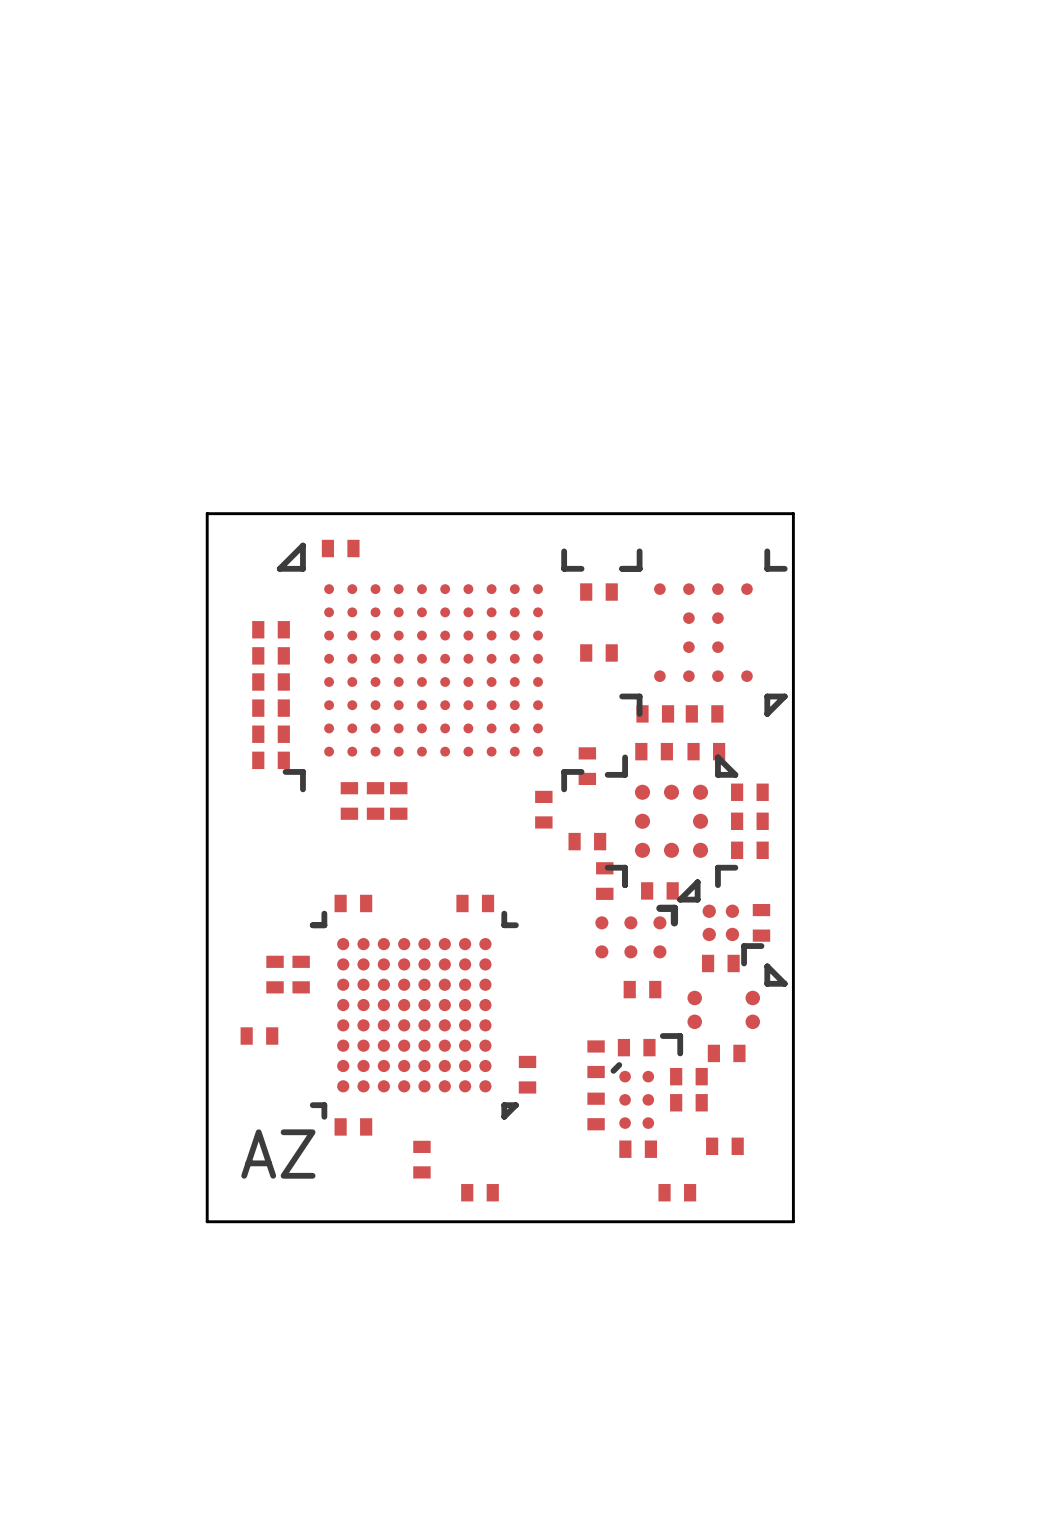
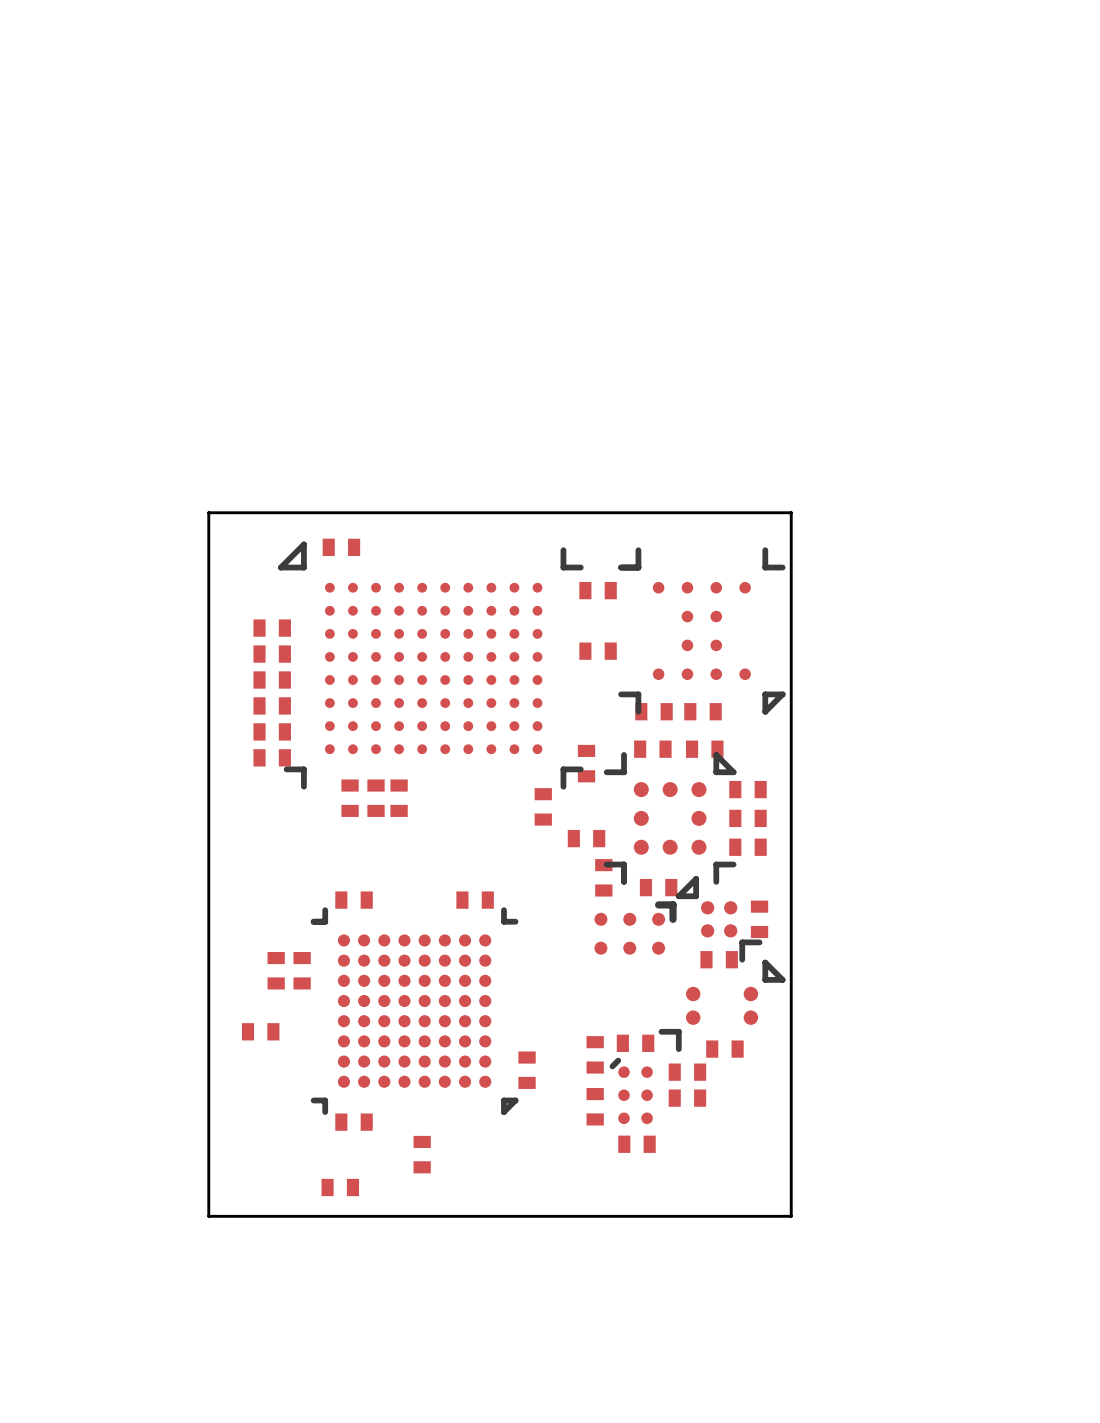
part: (642, 989) -> none
part: (724, 1146) -> none
text: AZ (278, 1154) -> none
part position: (479, 1192) -> (340, 1187)
part: (677, 1192) -> none

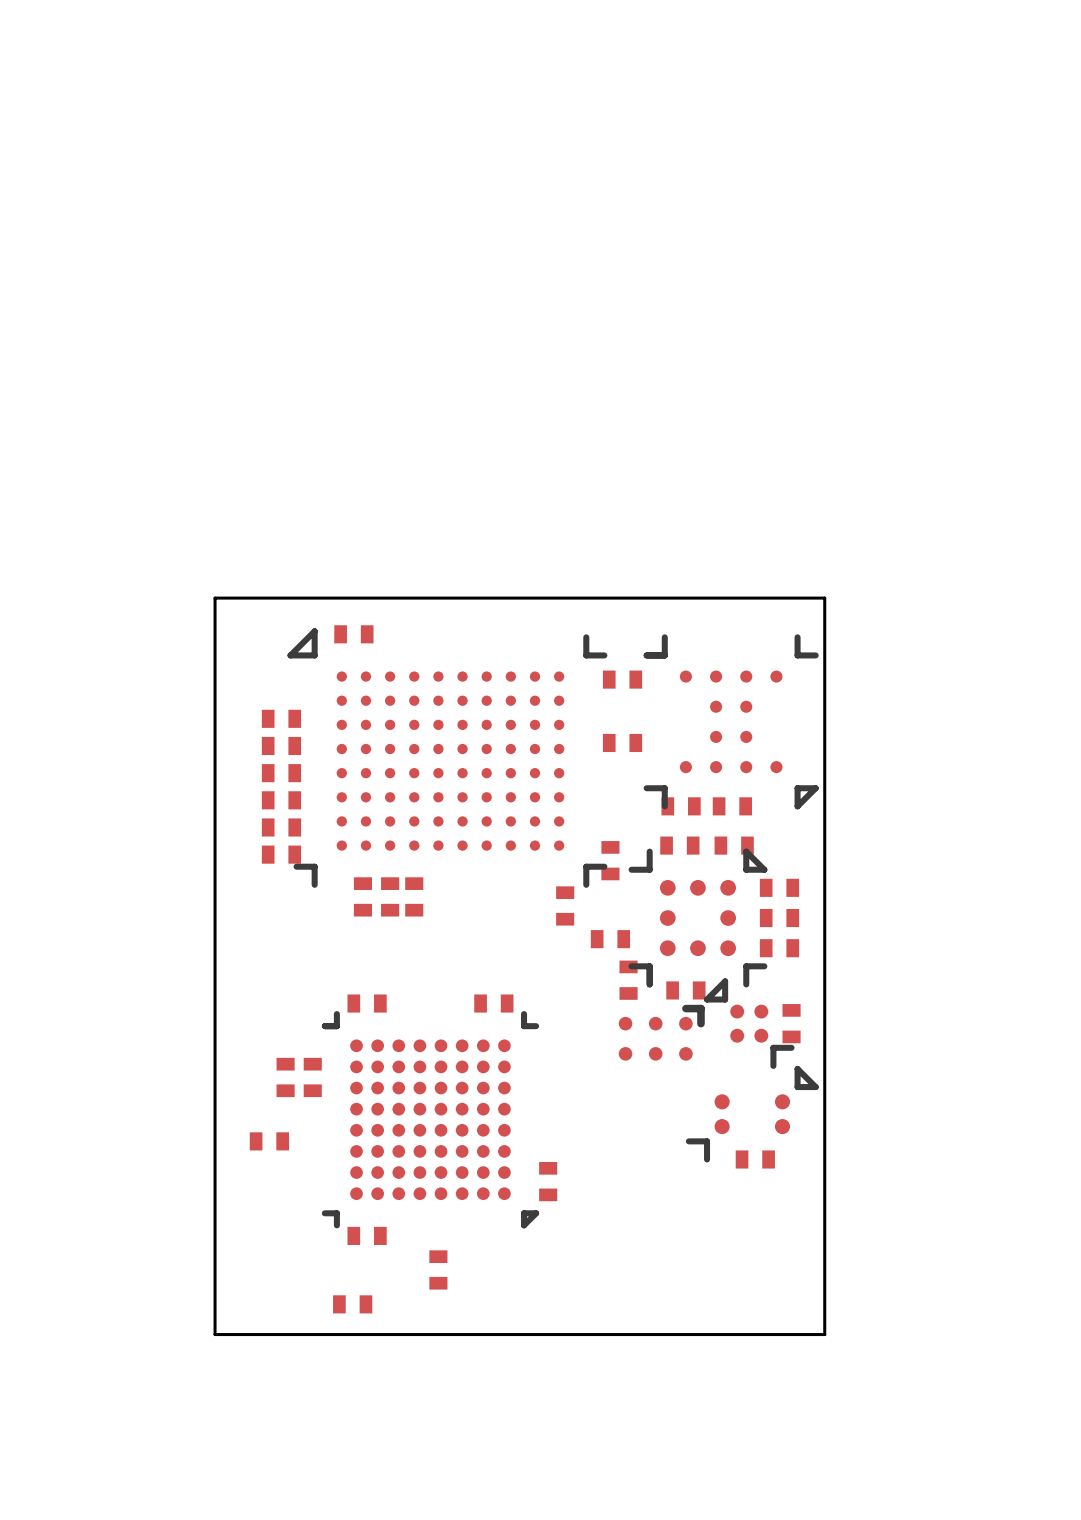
part: (719, 959) -> none
part: (635, 1043) -> none
part: (595, 1054) -> none
part: (687, 1072) -> none
part: (631, 1090) -> none
part: (687, 1098) -> none
part: (595, 1106) -> none
part: (636, 1144) -> none

